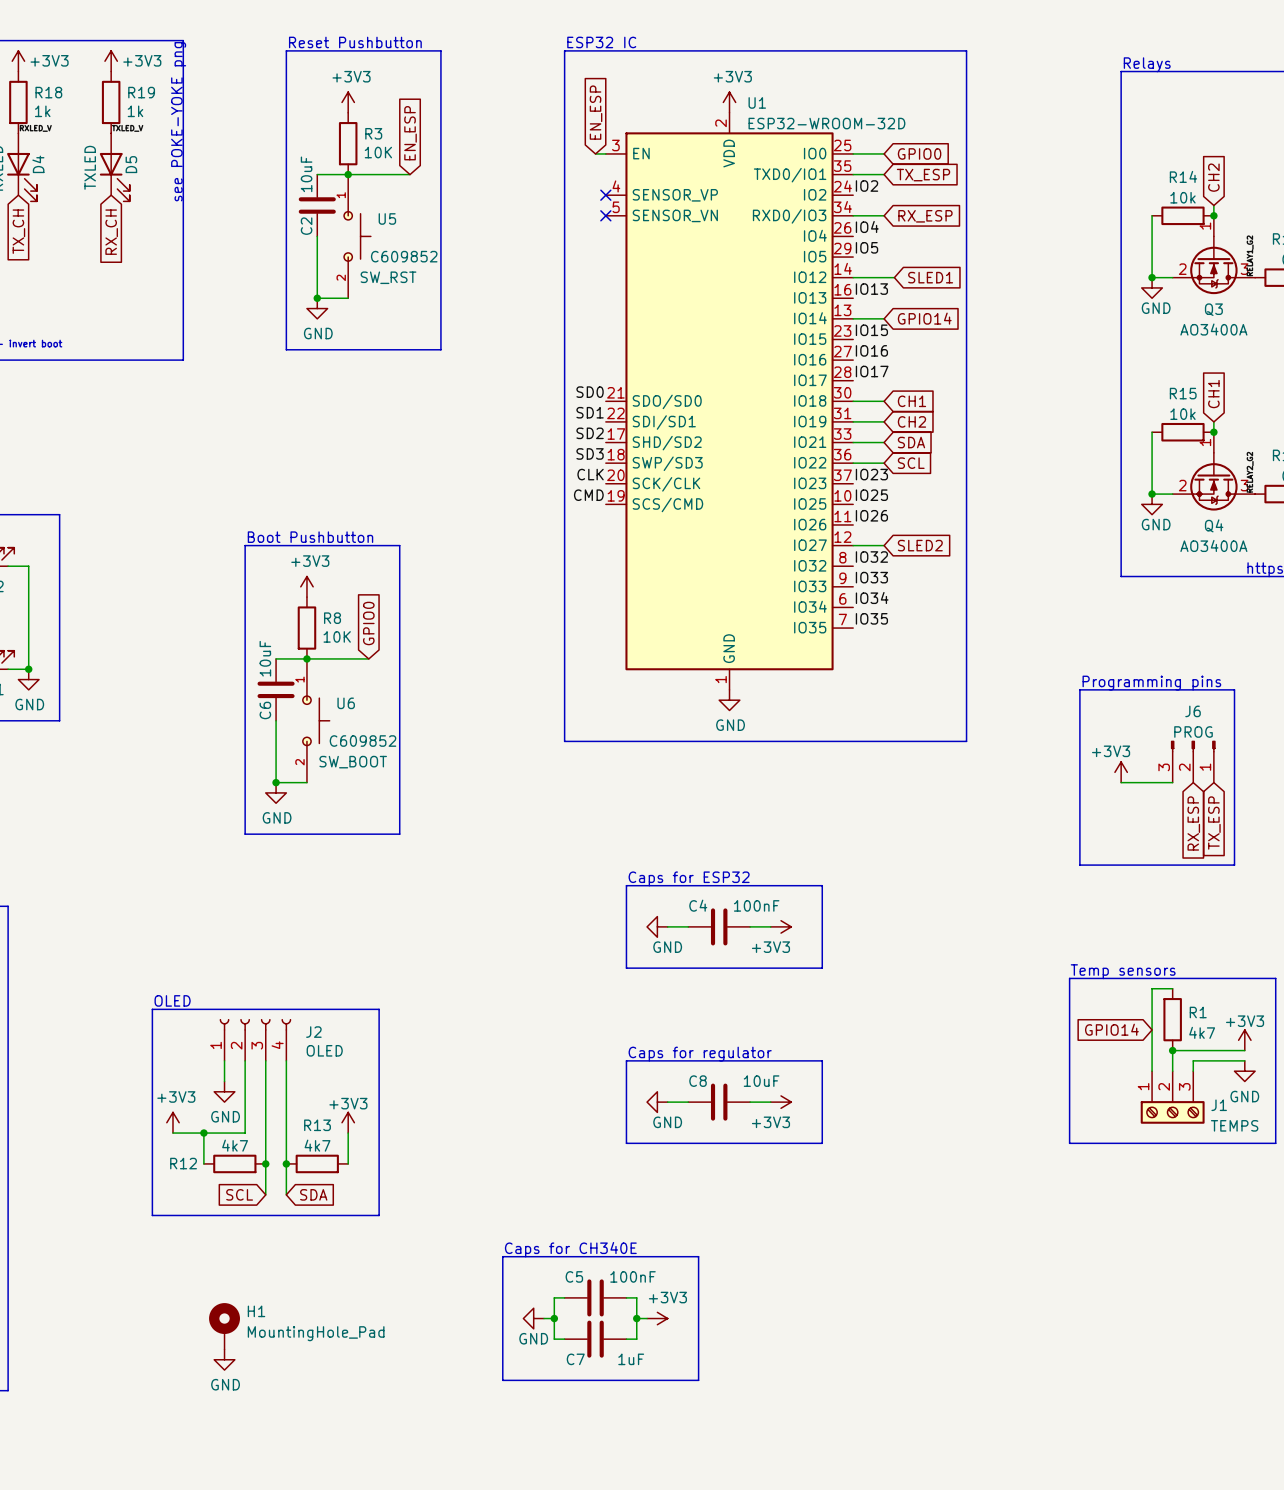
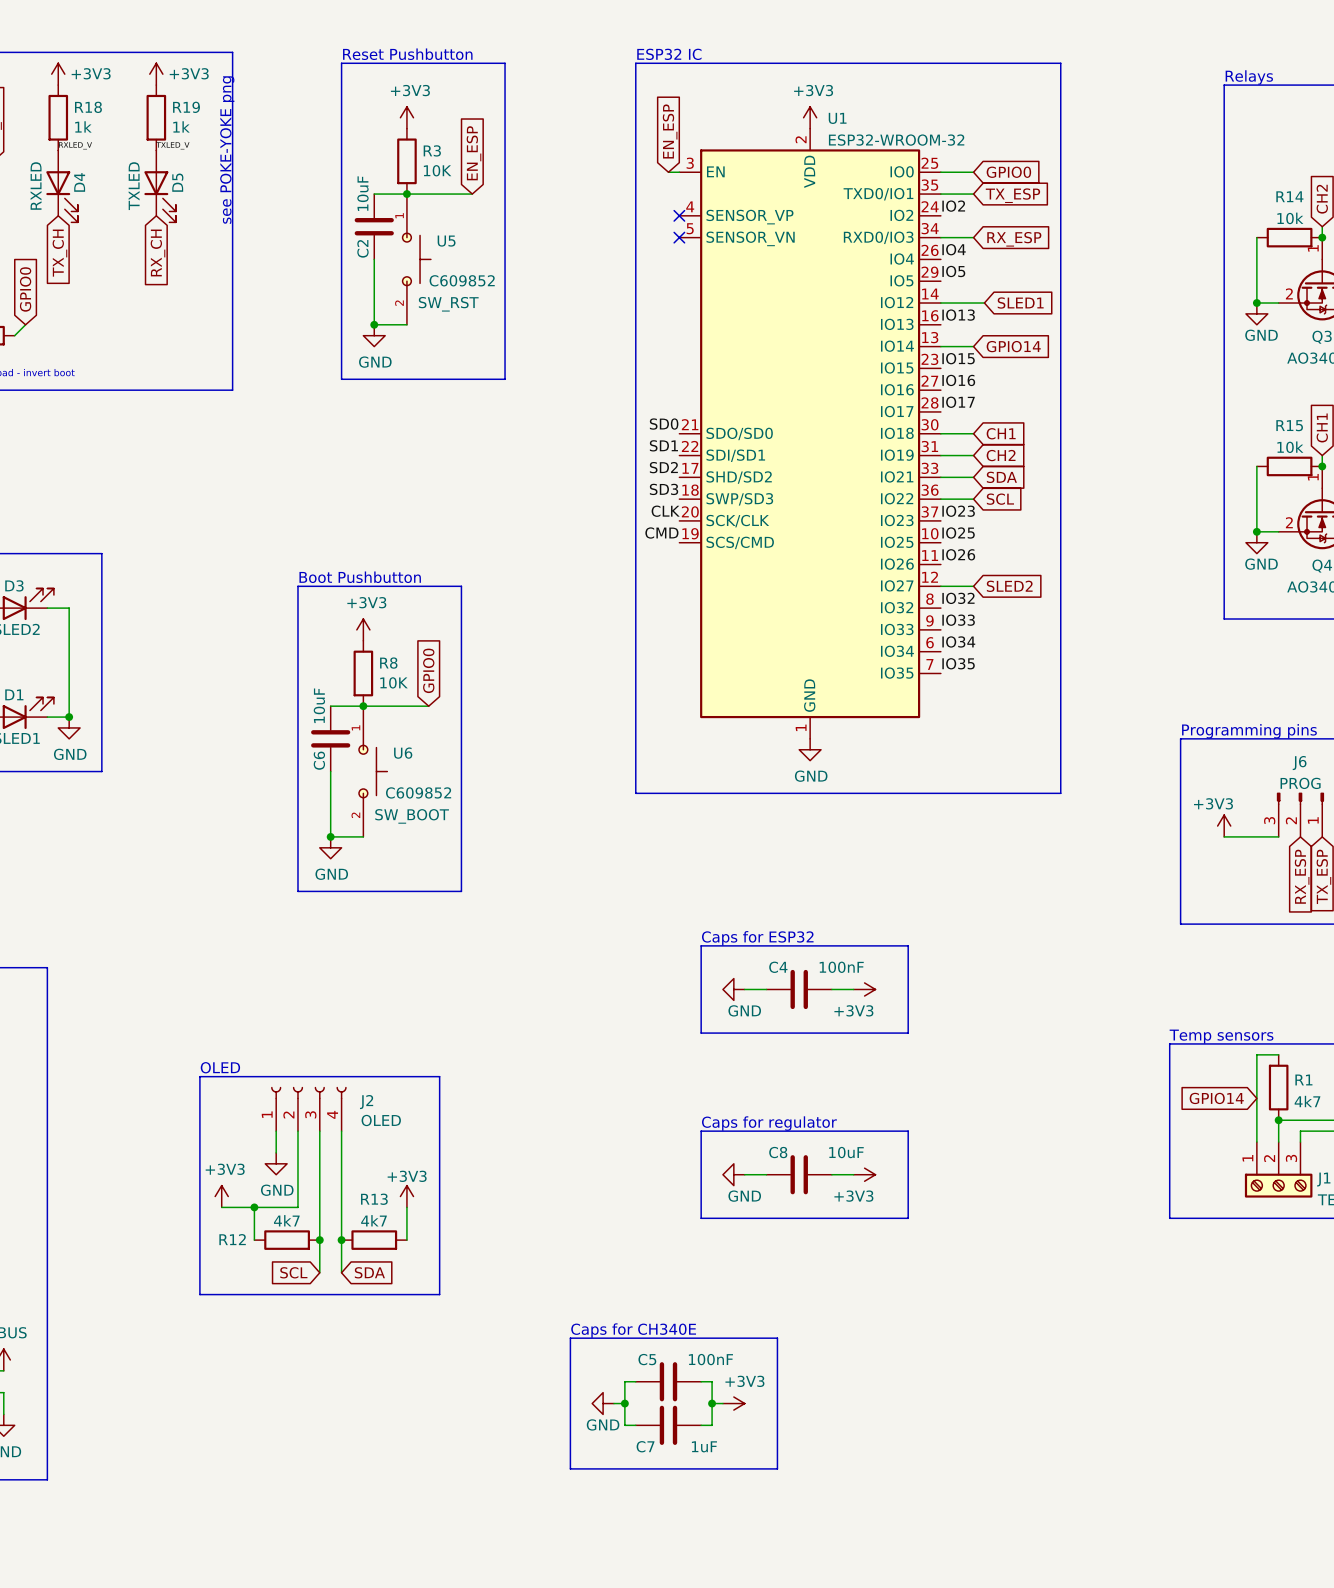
U1 value: ESP32-WROOM-32D (826, 123) -> ESP32-WROOM-32 (896, 140)
H1: MountingHole_Pad (224, 1326) -> none
power symbol: GND (224, 1359) -> none

